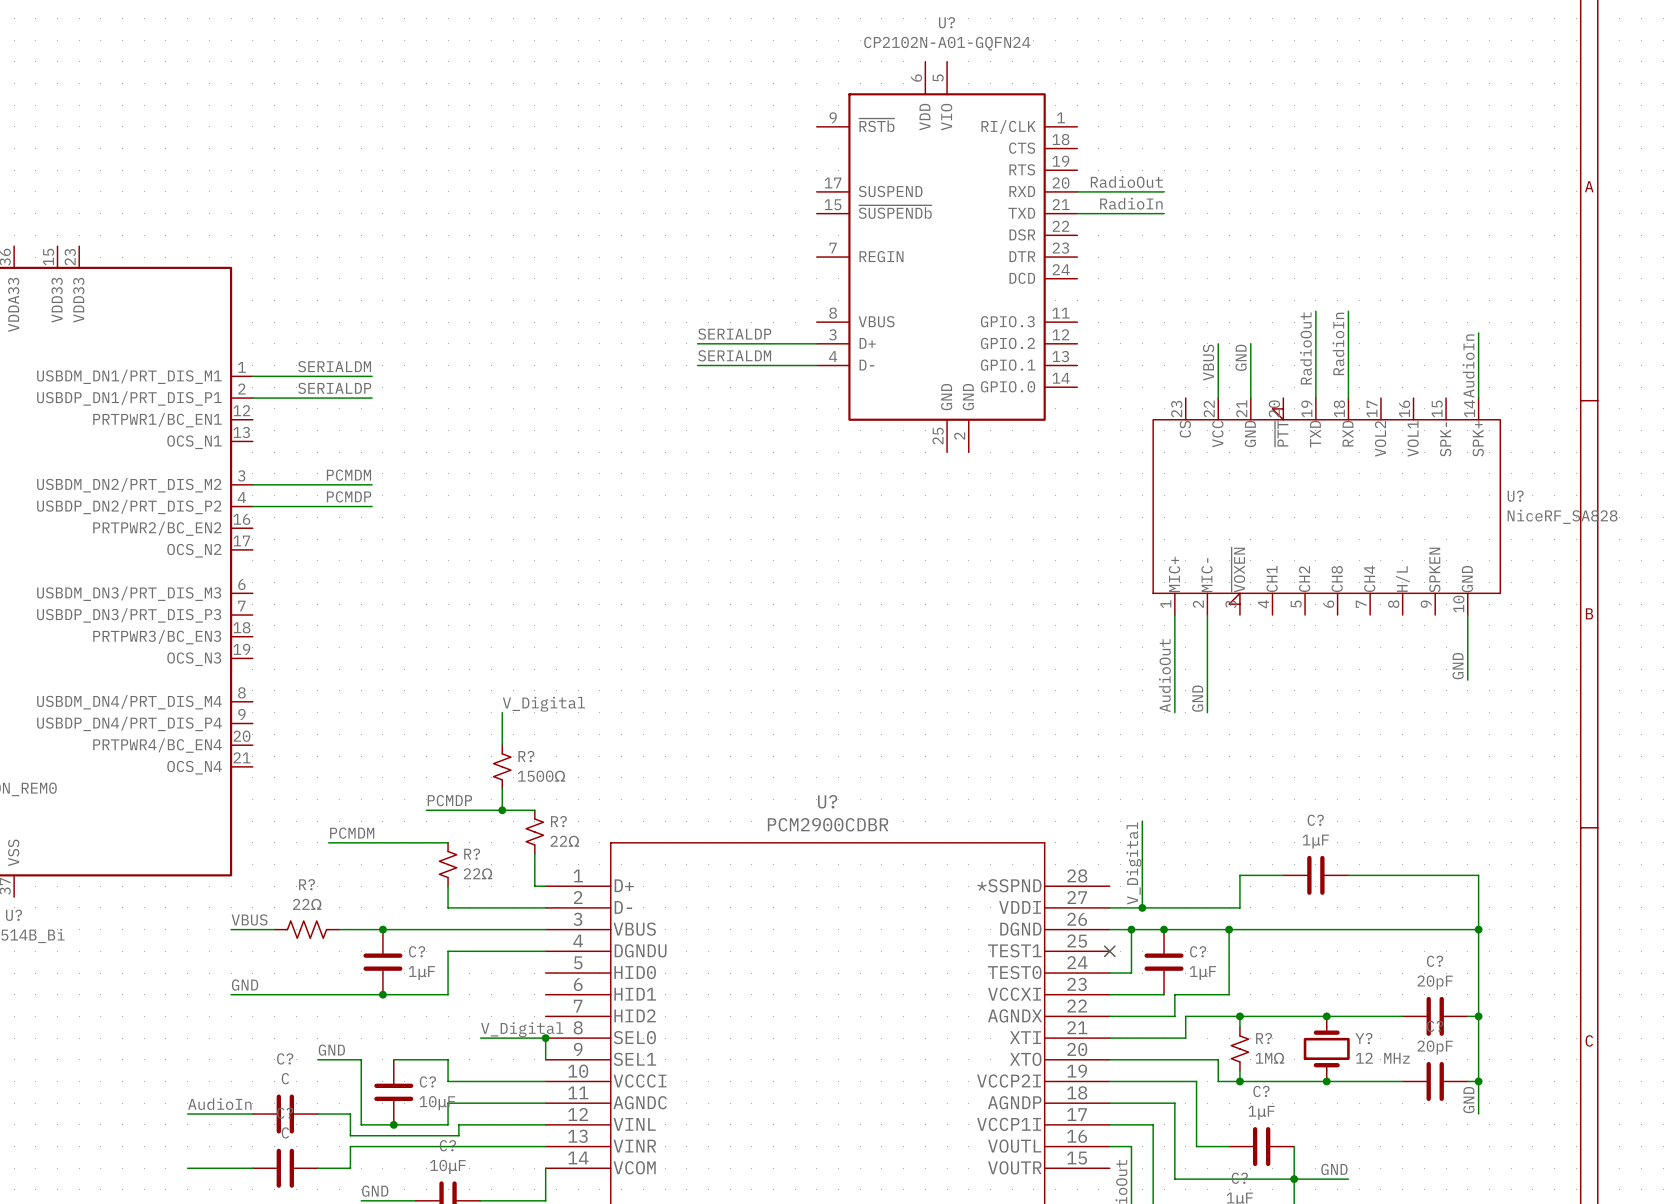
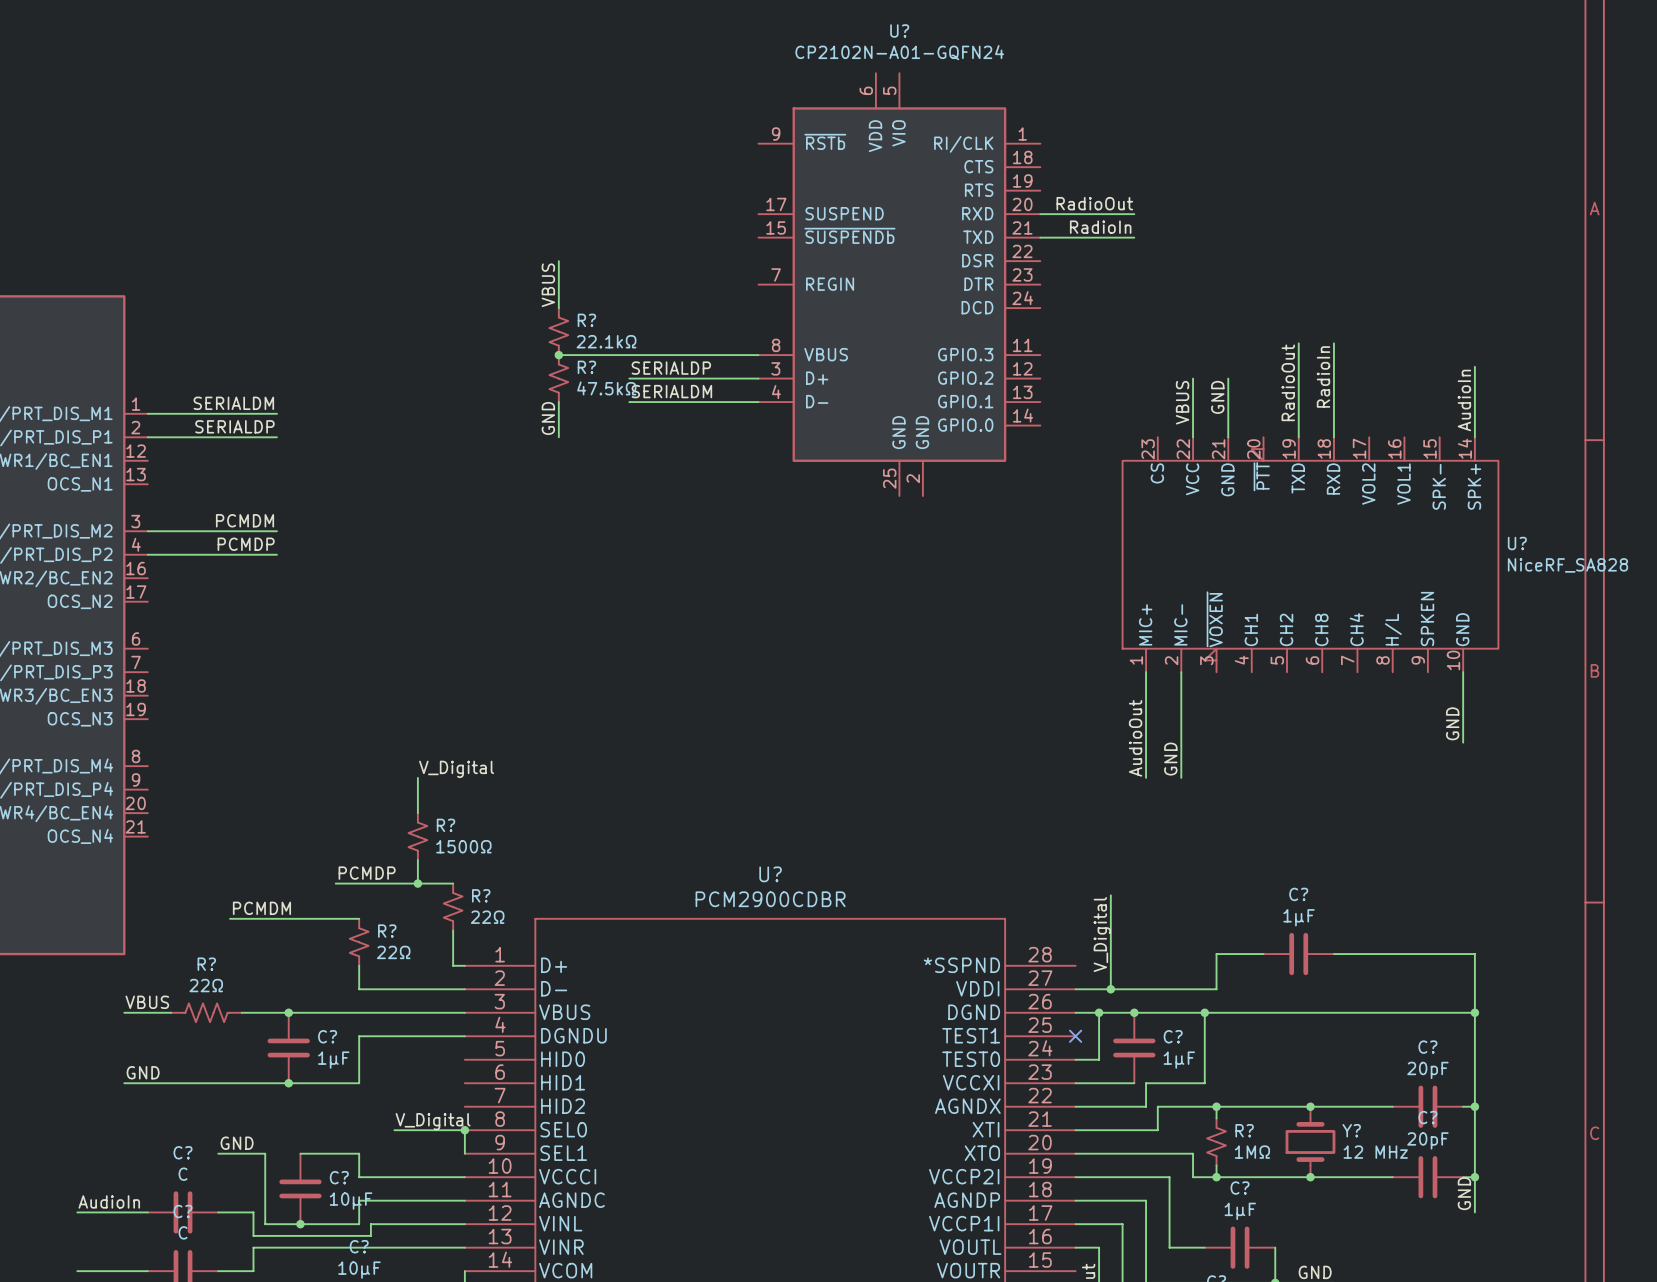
wire: none -> (558, 261) (558, 308)
label: none -> VBUS (548, 285)
R?: none -> 22.1kΩ (558, 331)
wire: none -> (558, 355) (758, 355)
junction: none -> (558, 355)
R?: none -> 47.5kΩ (558, 378)
wire: none -> (558, 402) (558, 437)
label: none -> GND (548, 418)

